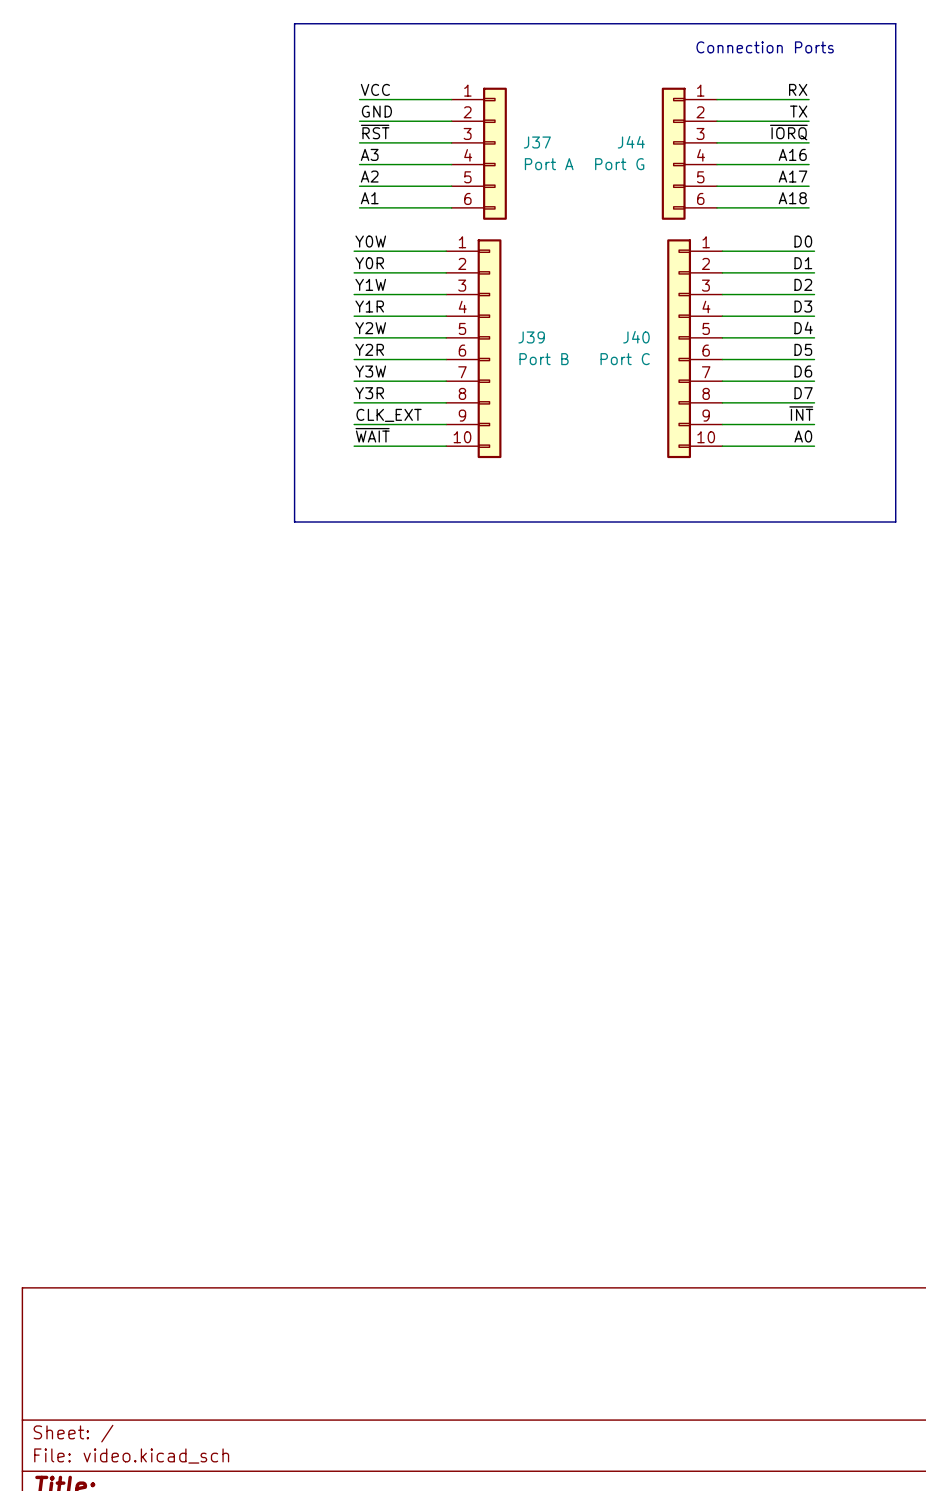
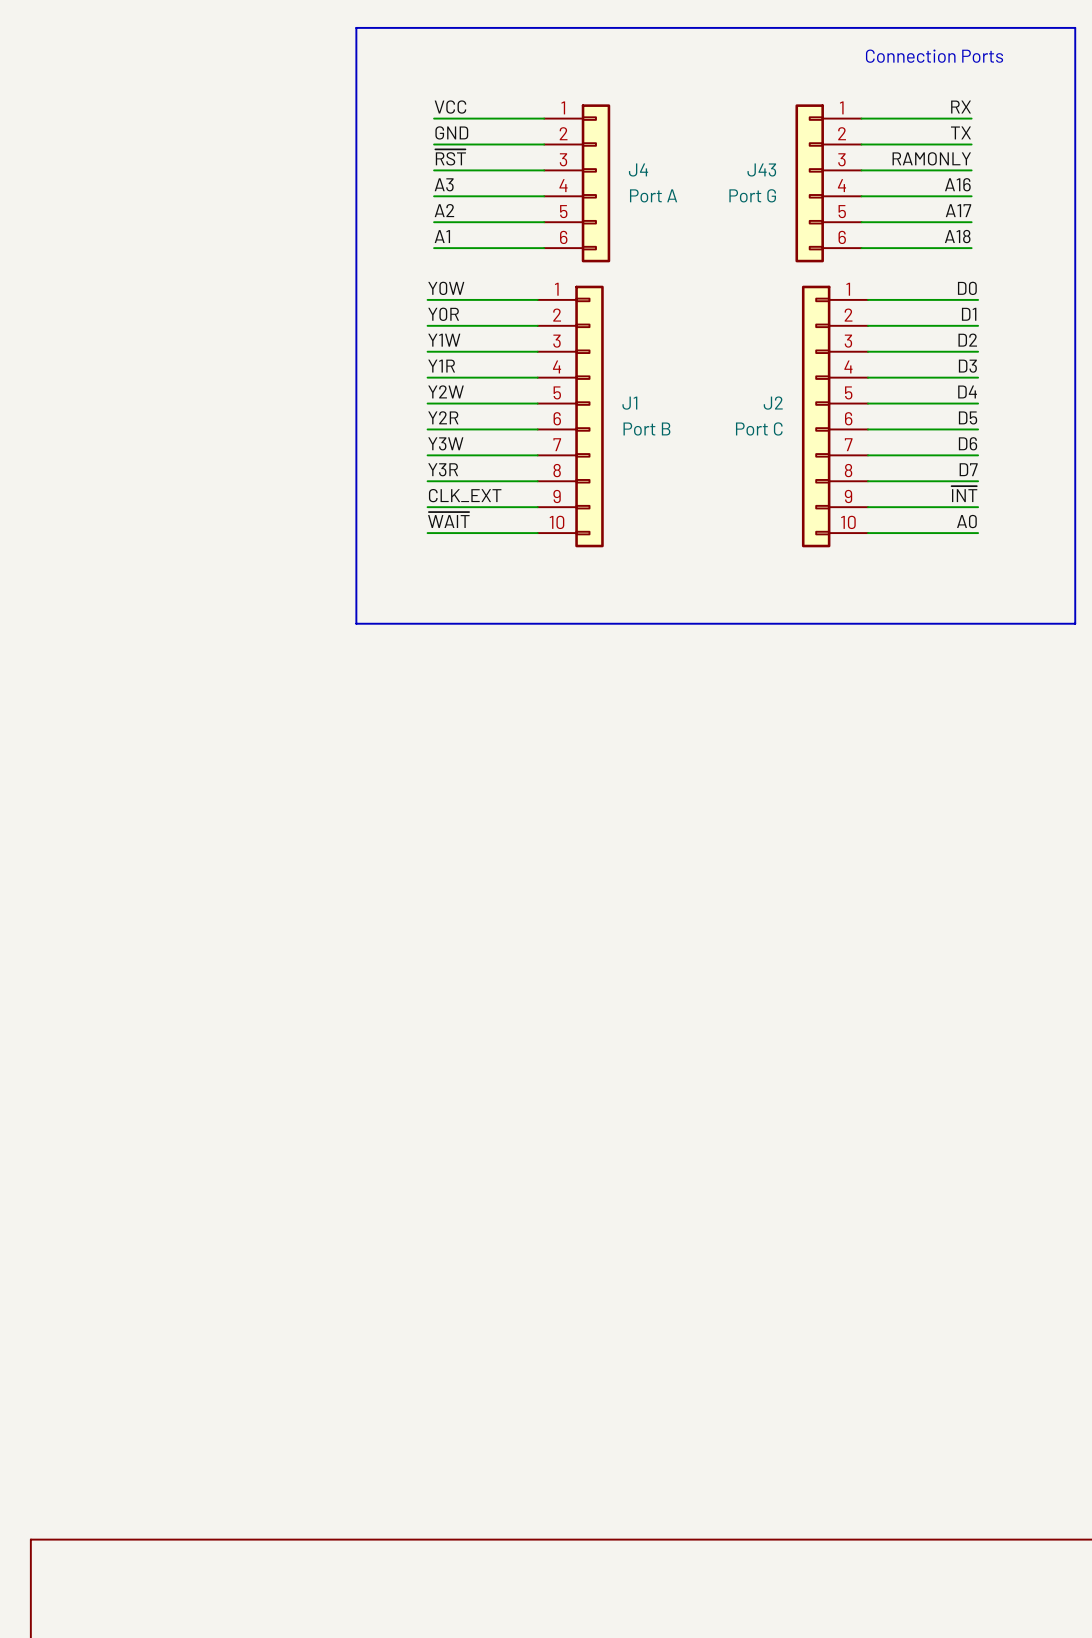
label: ~{IORQ} (788, 132) -> RAMONLY (931, 158)
J37 name: J37 (537, 142) -> J4 (638, 169)
J44 name: J44 (631, 142) -> J43 (761, 169)
J39 name: J39 (531, 337) -> J1 (629, 403)
J40 name: J40 (636, 337) -> J2 (773, 403)

